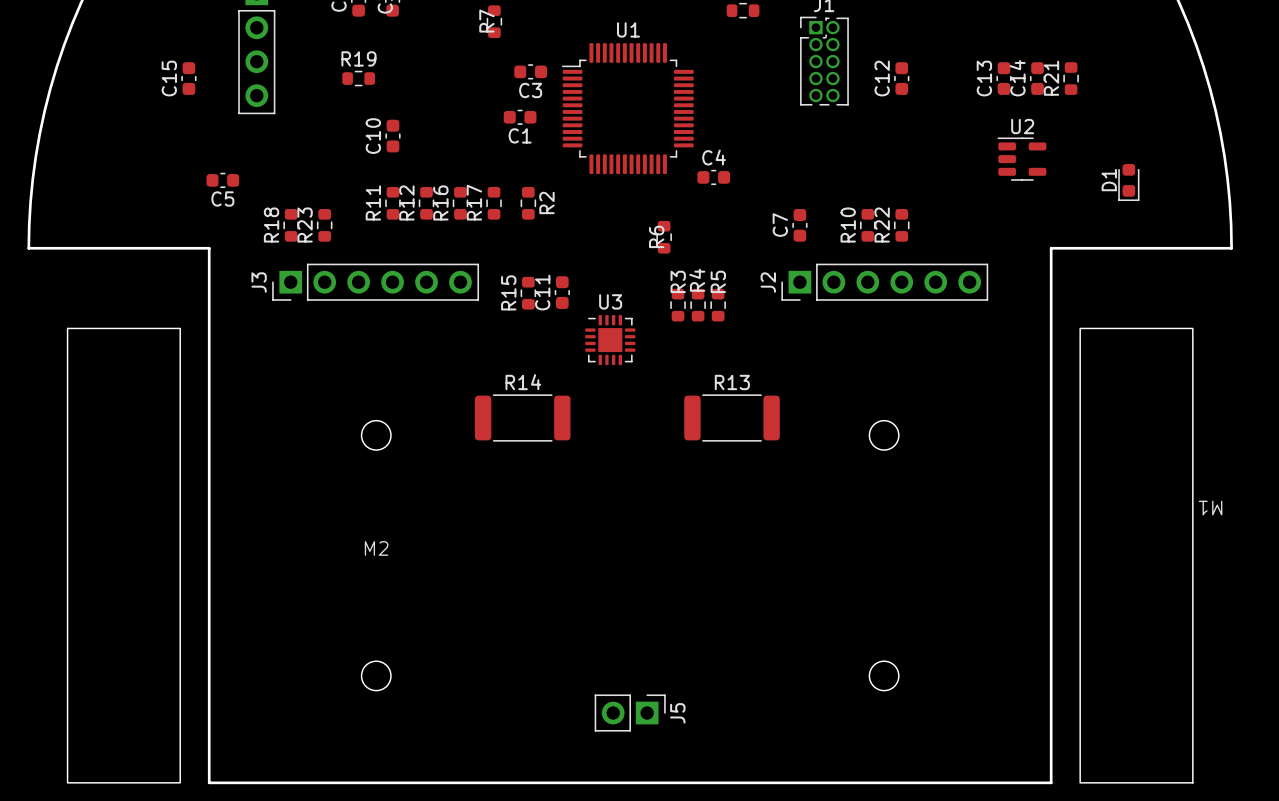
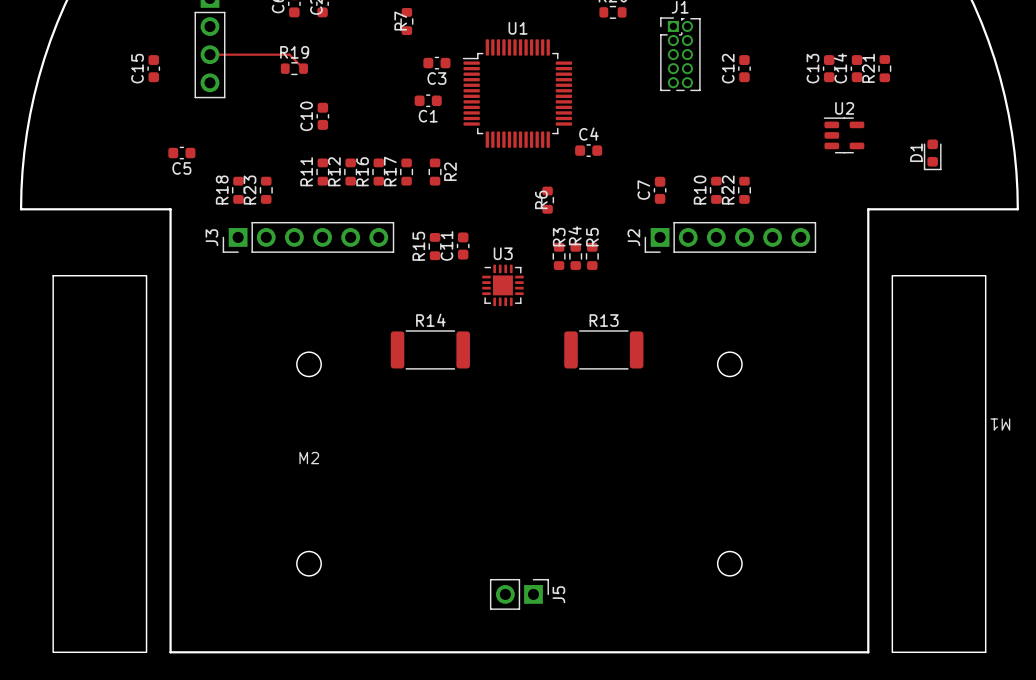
track: none -> (210, 54) (289, 54) (303, 68)

